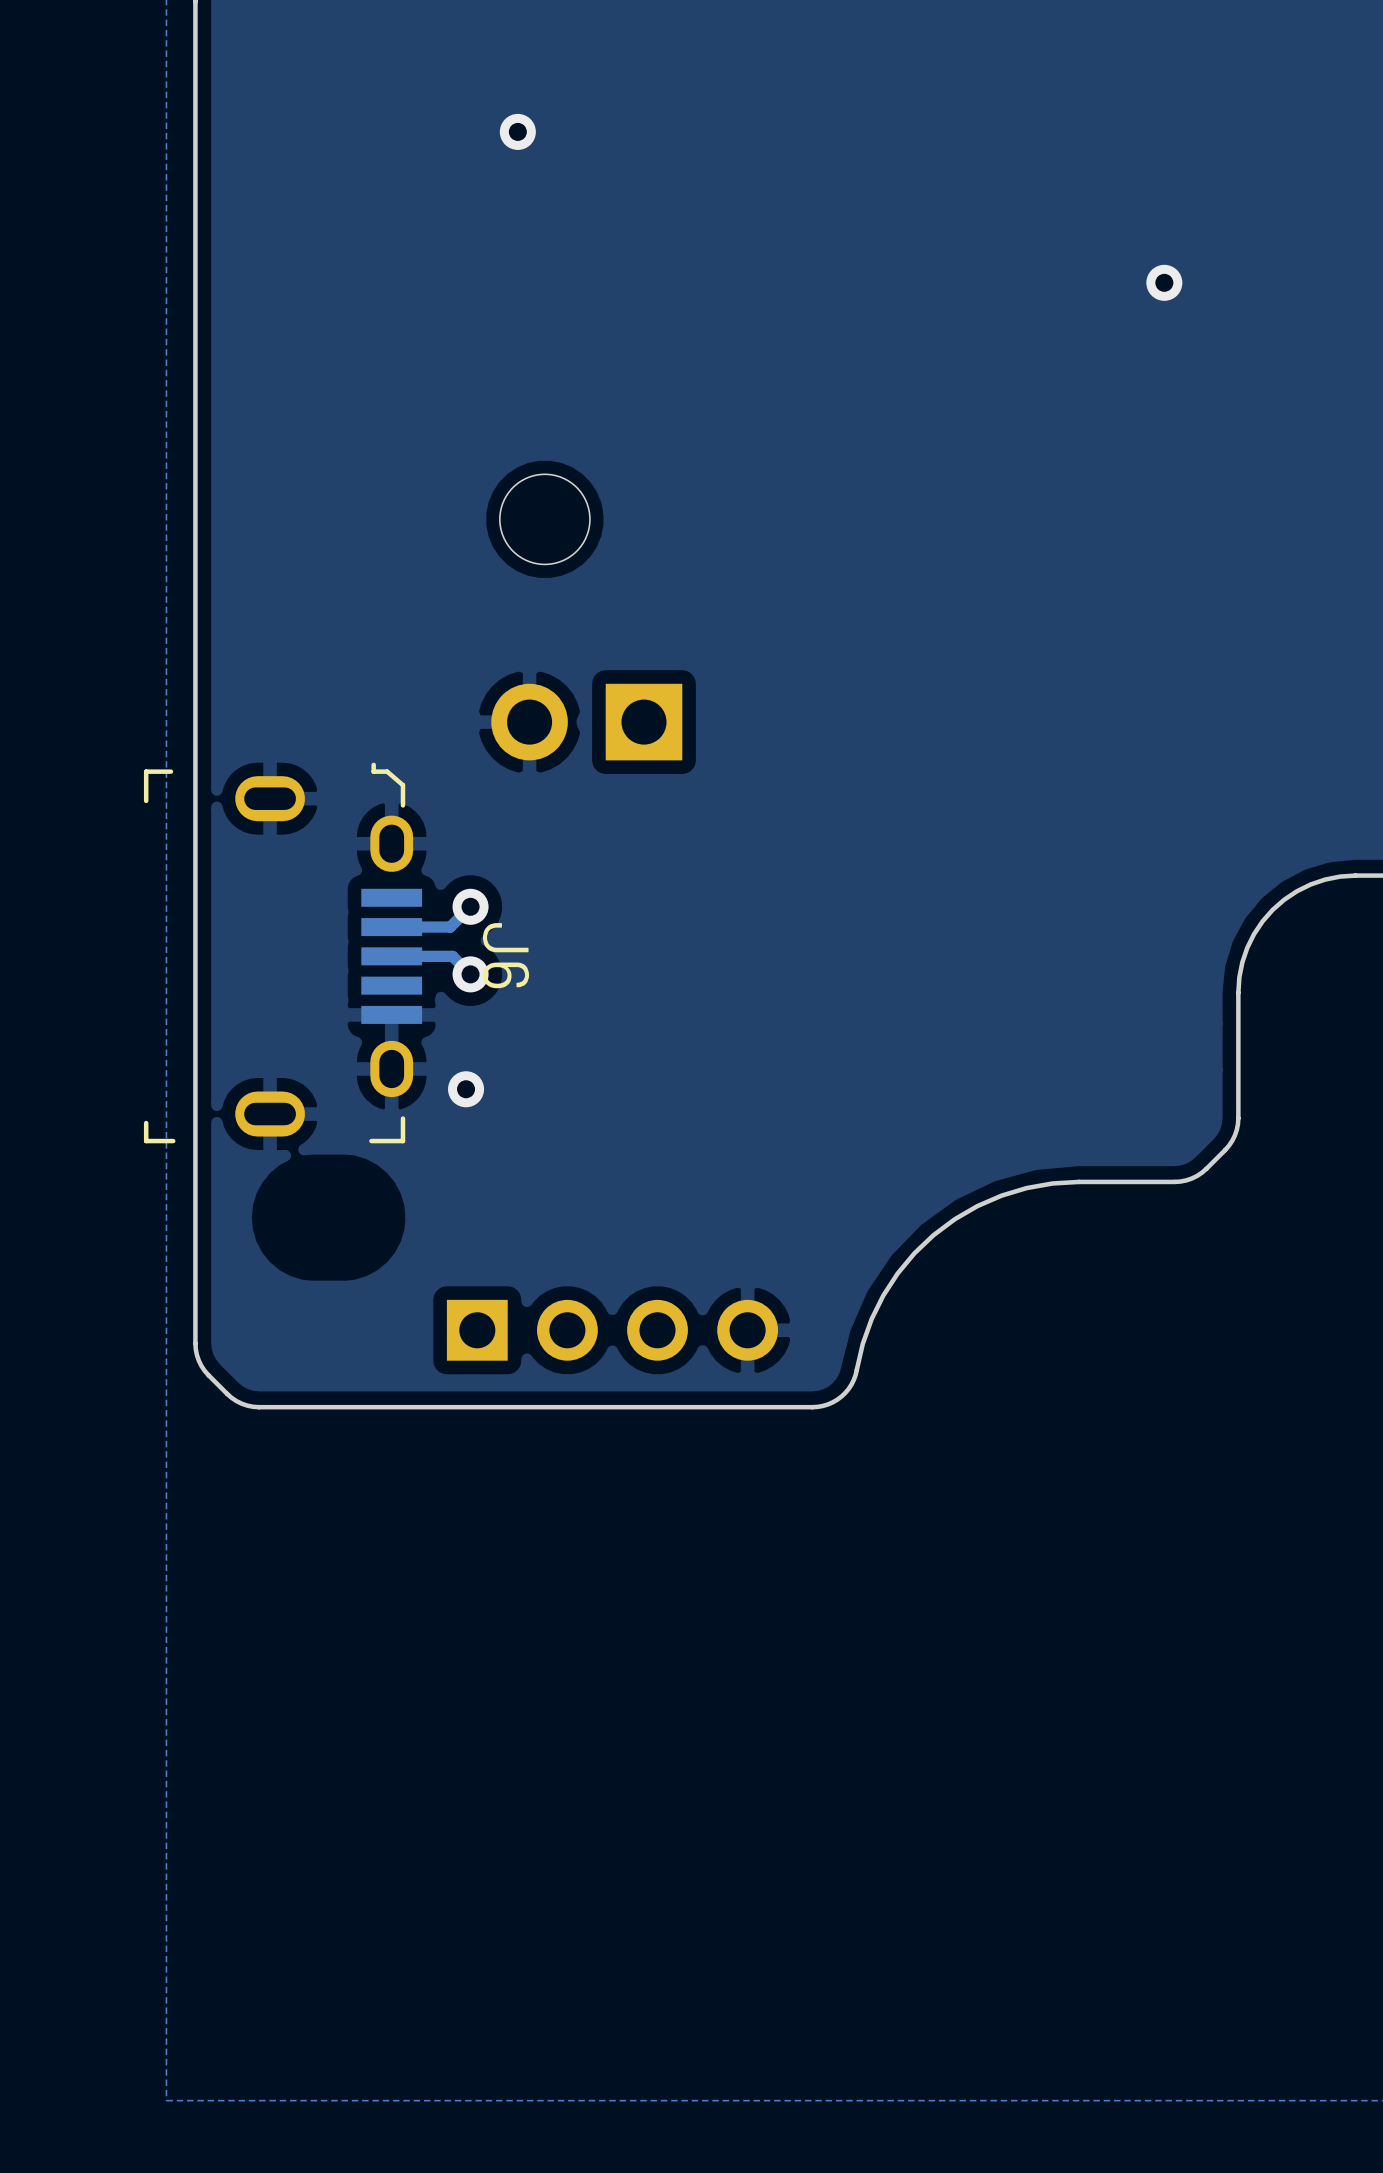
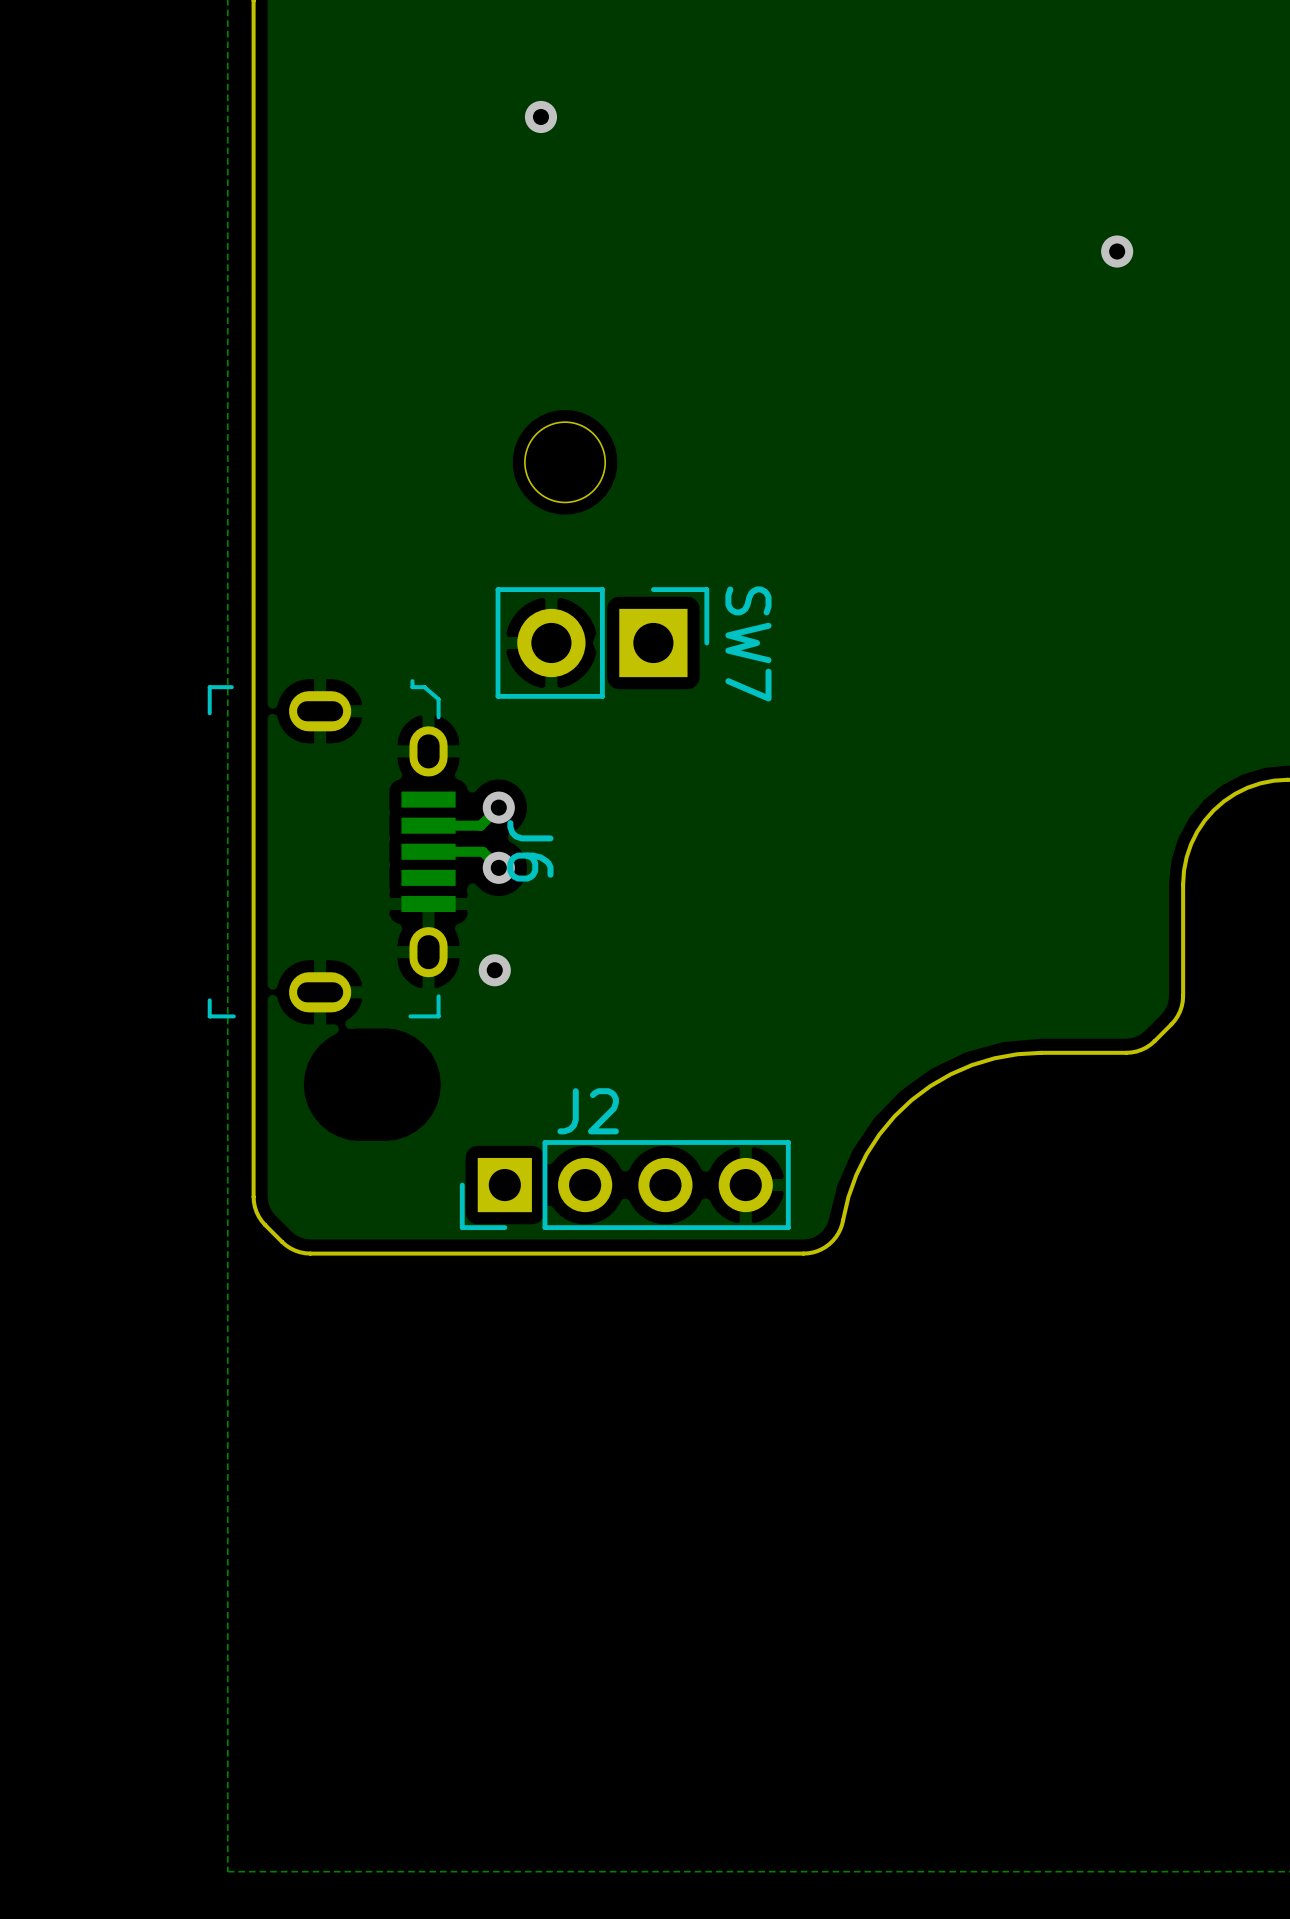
SW7 side: top (586, 722) -> bottom (602, 642)
J2 side: top (612, 1330) -> bottom (625, 1185)

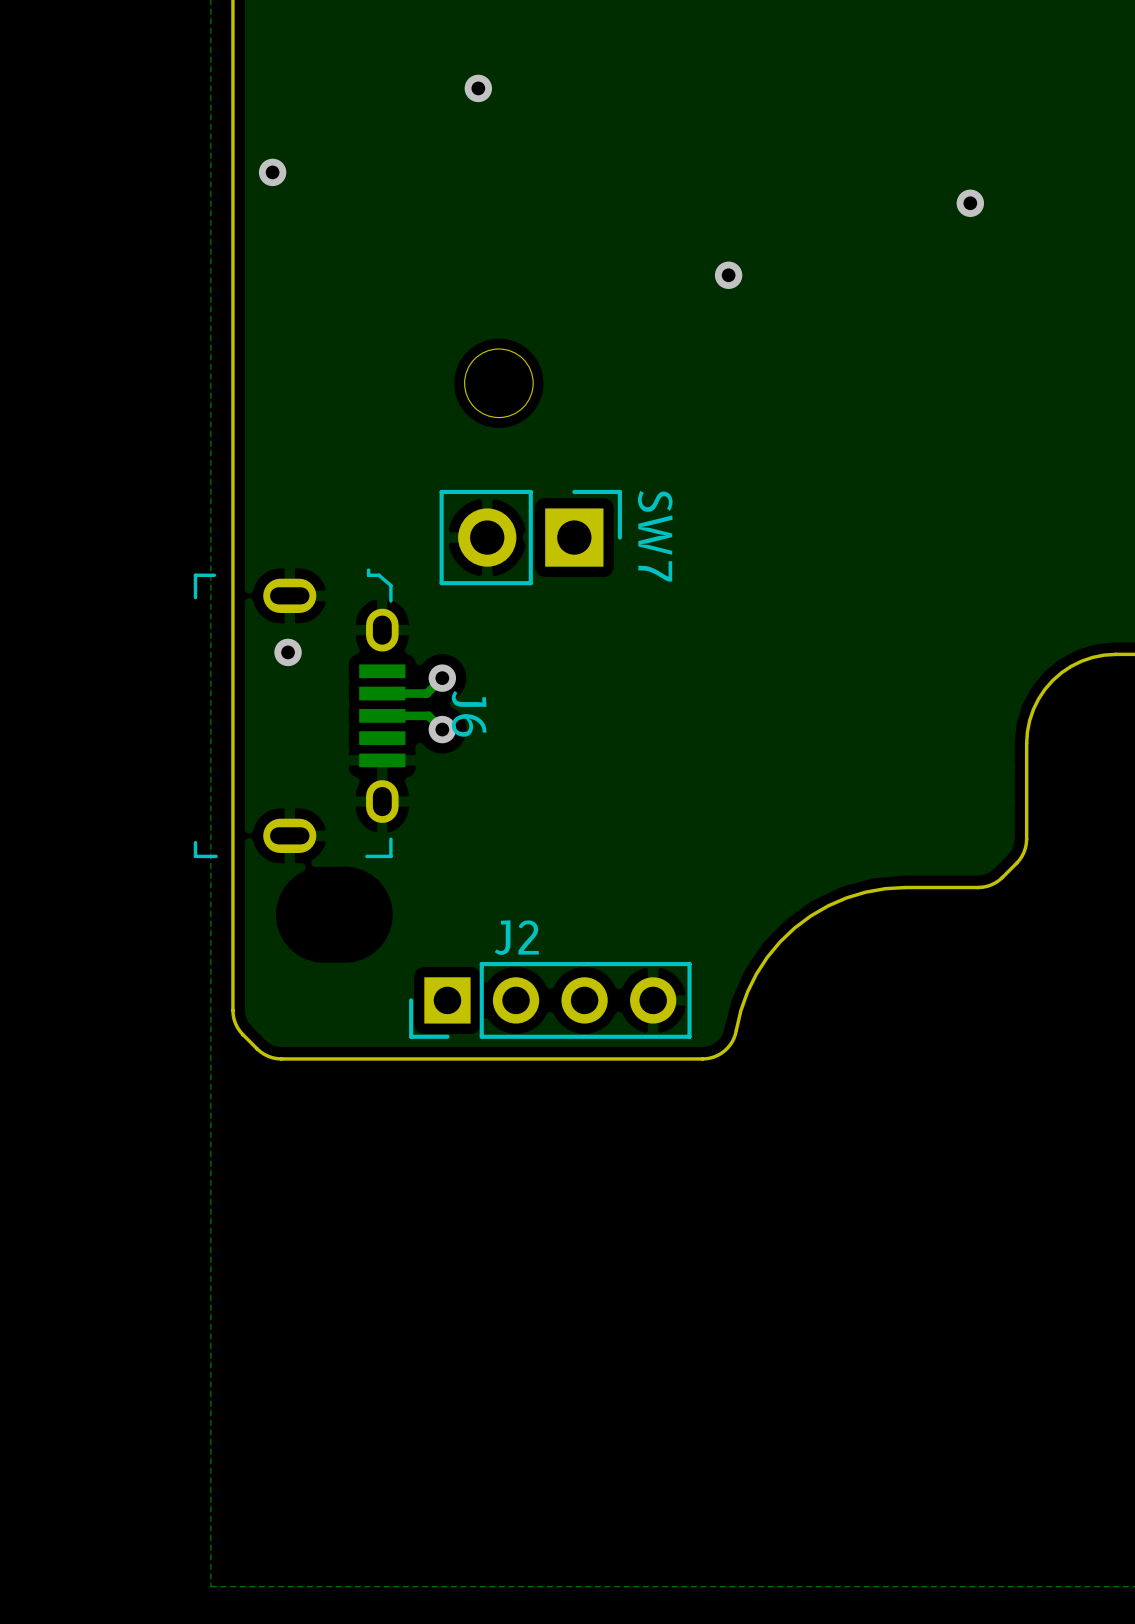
via: none -> (272, 172)
via: none -> (728, 275)
via: none -> (288, 652)
via: (494, 970) -> none

